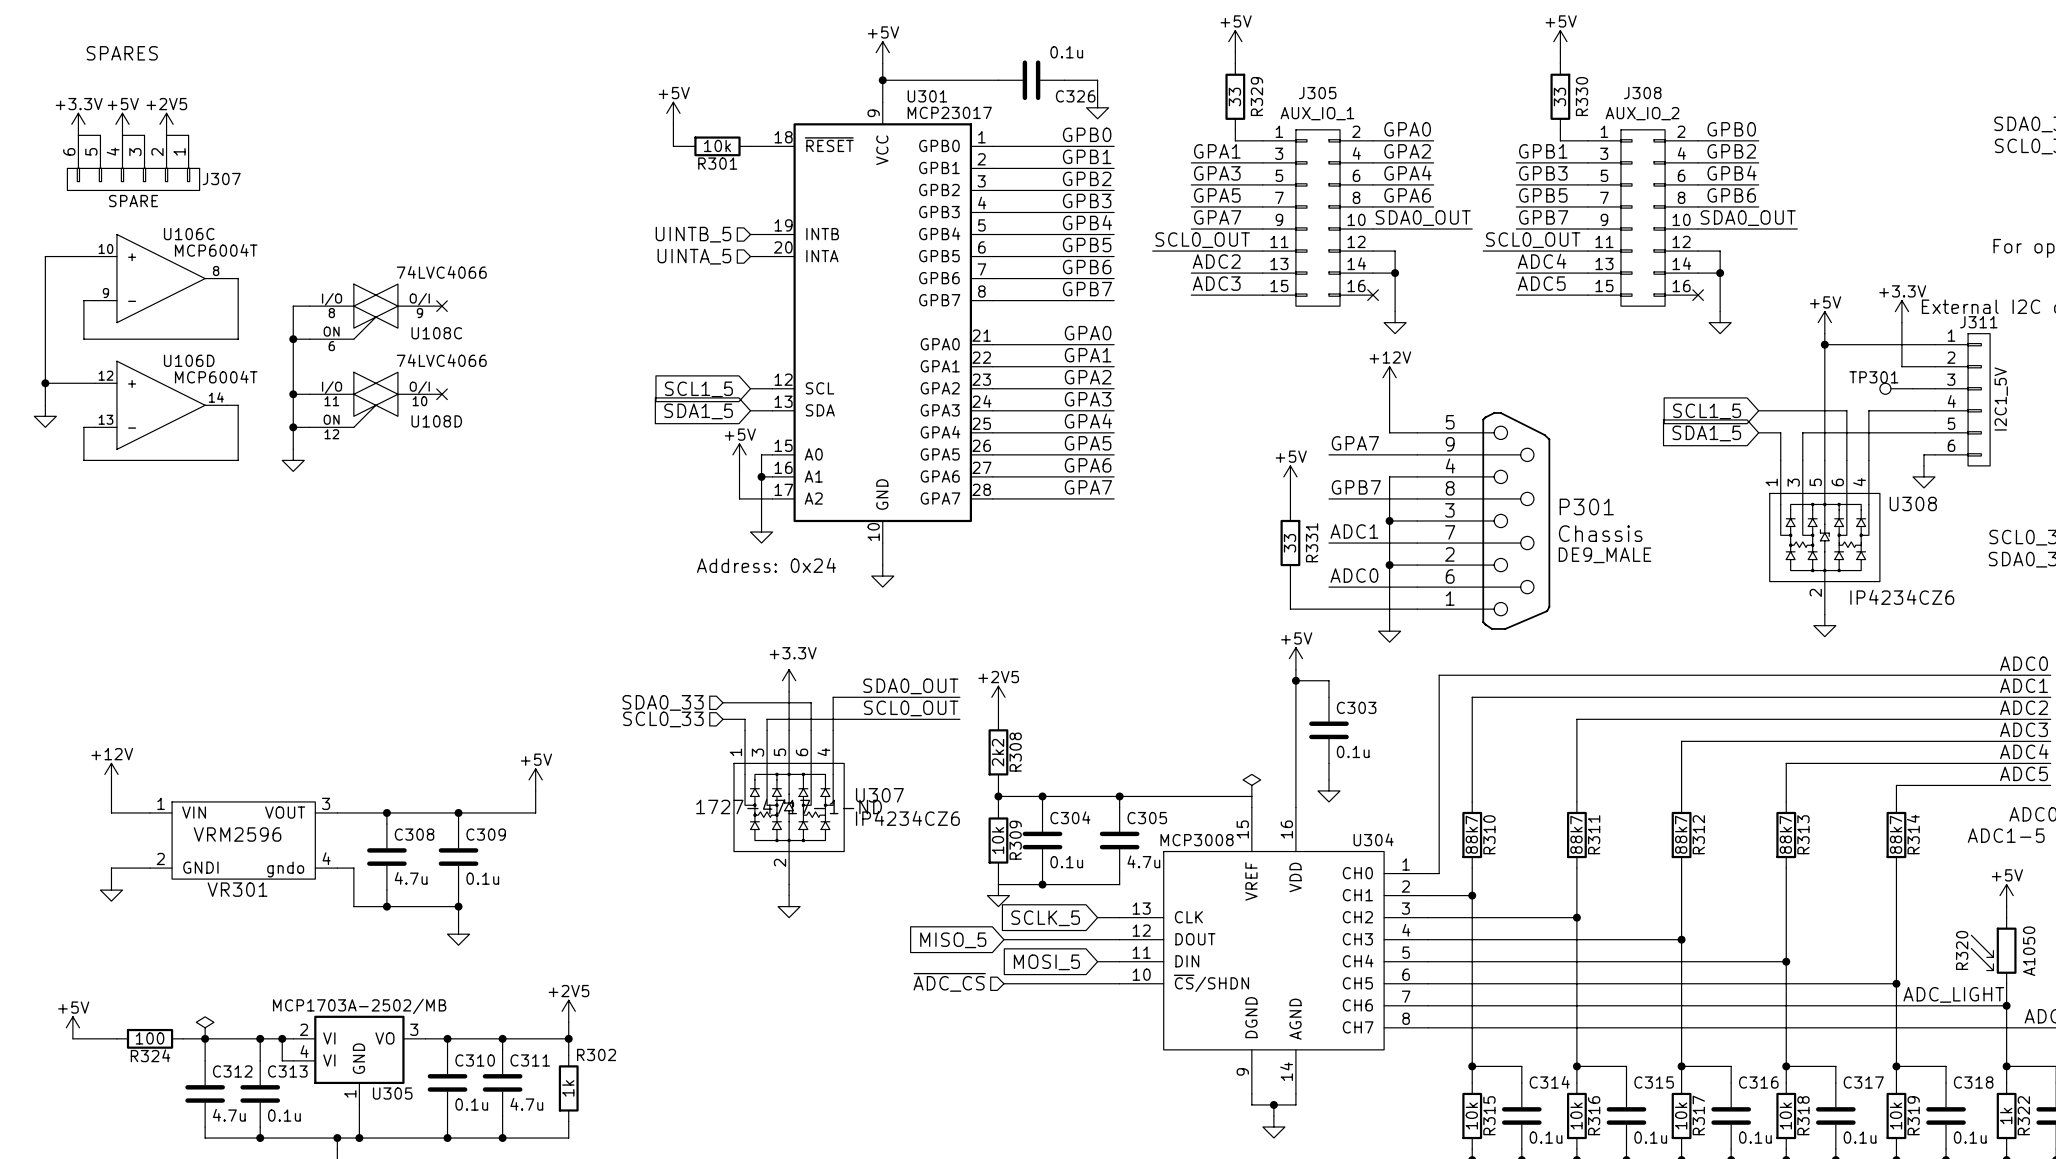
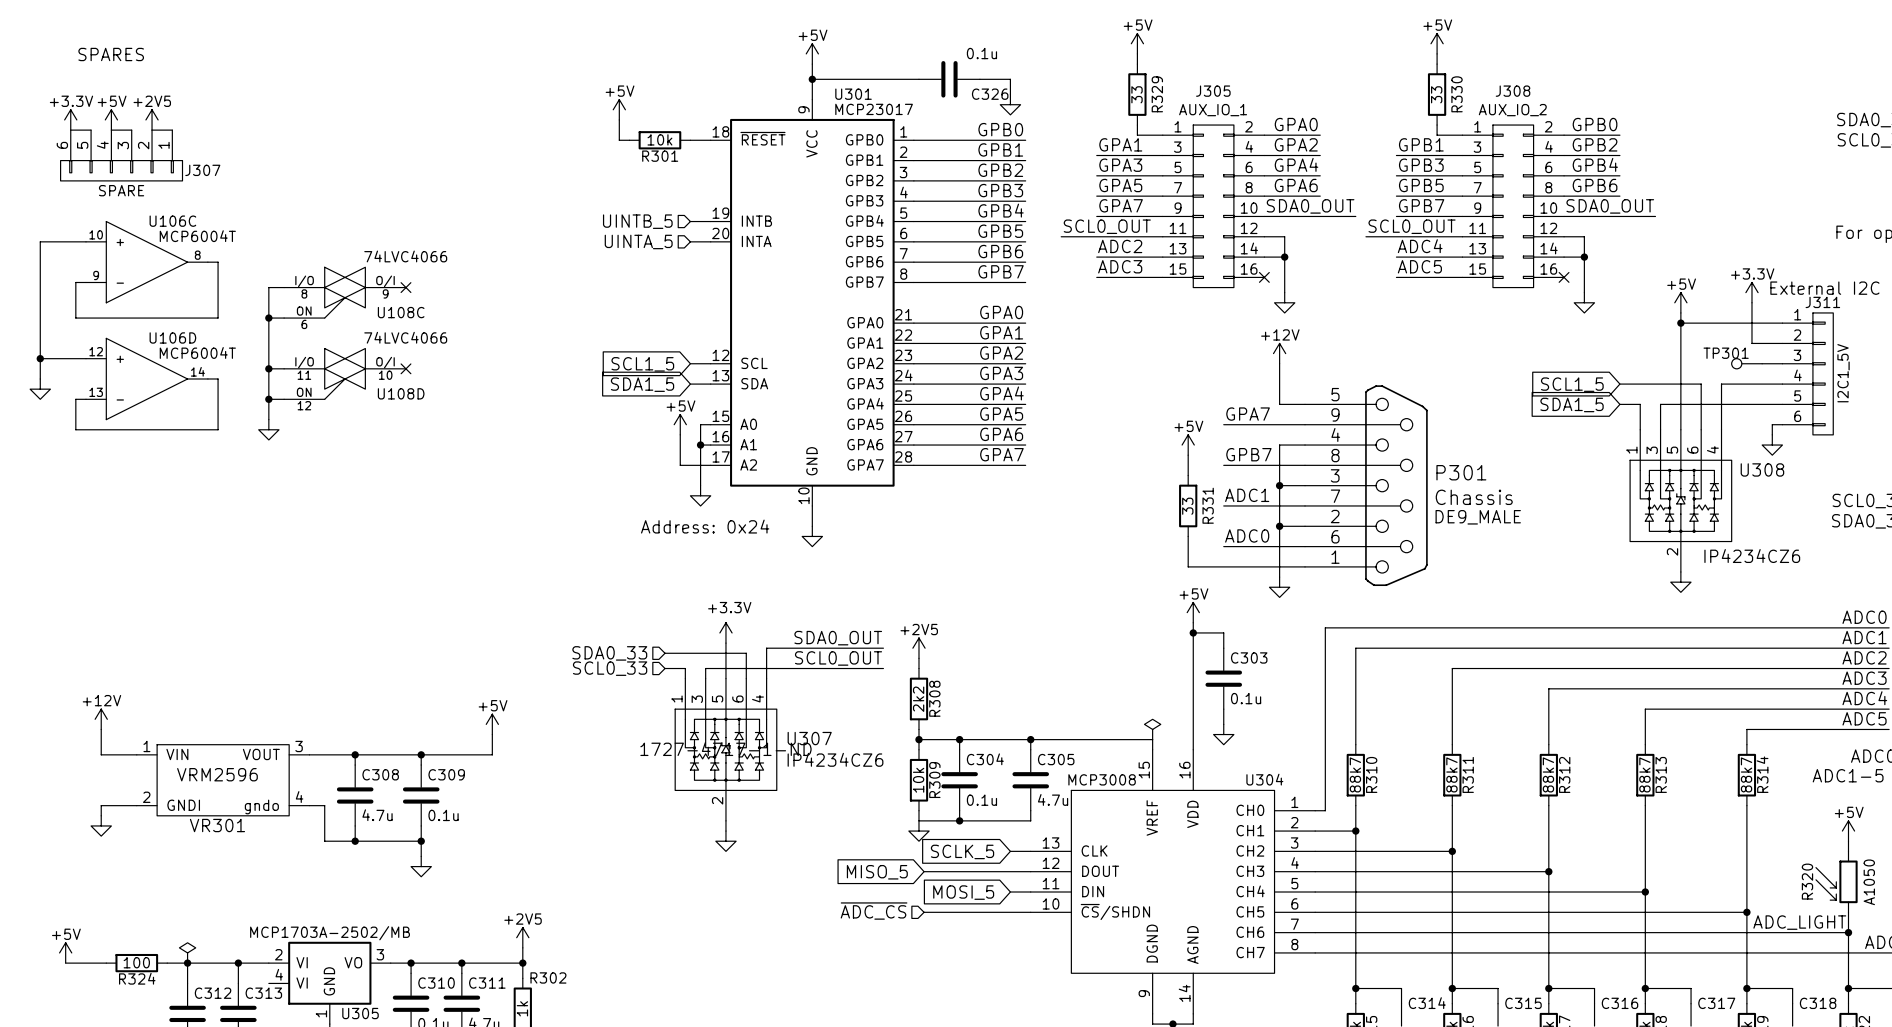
wire: (282, 1038) (282, 1060) (293, 1060) -> none
junction: (282, 1038) -> none

